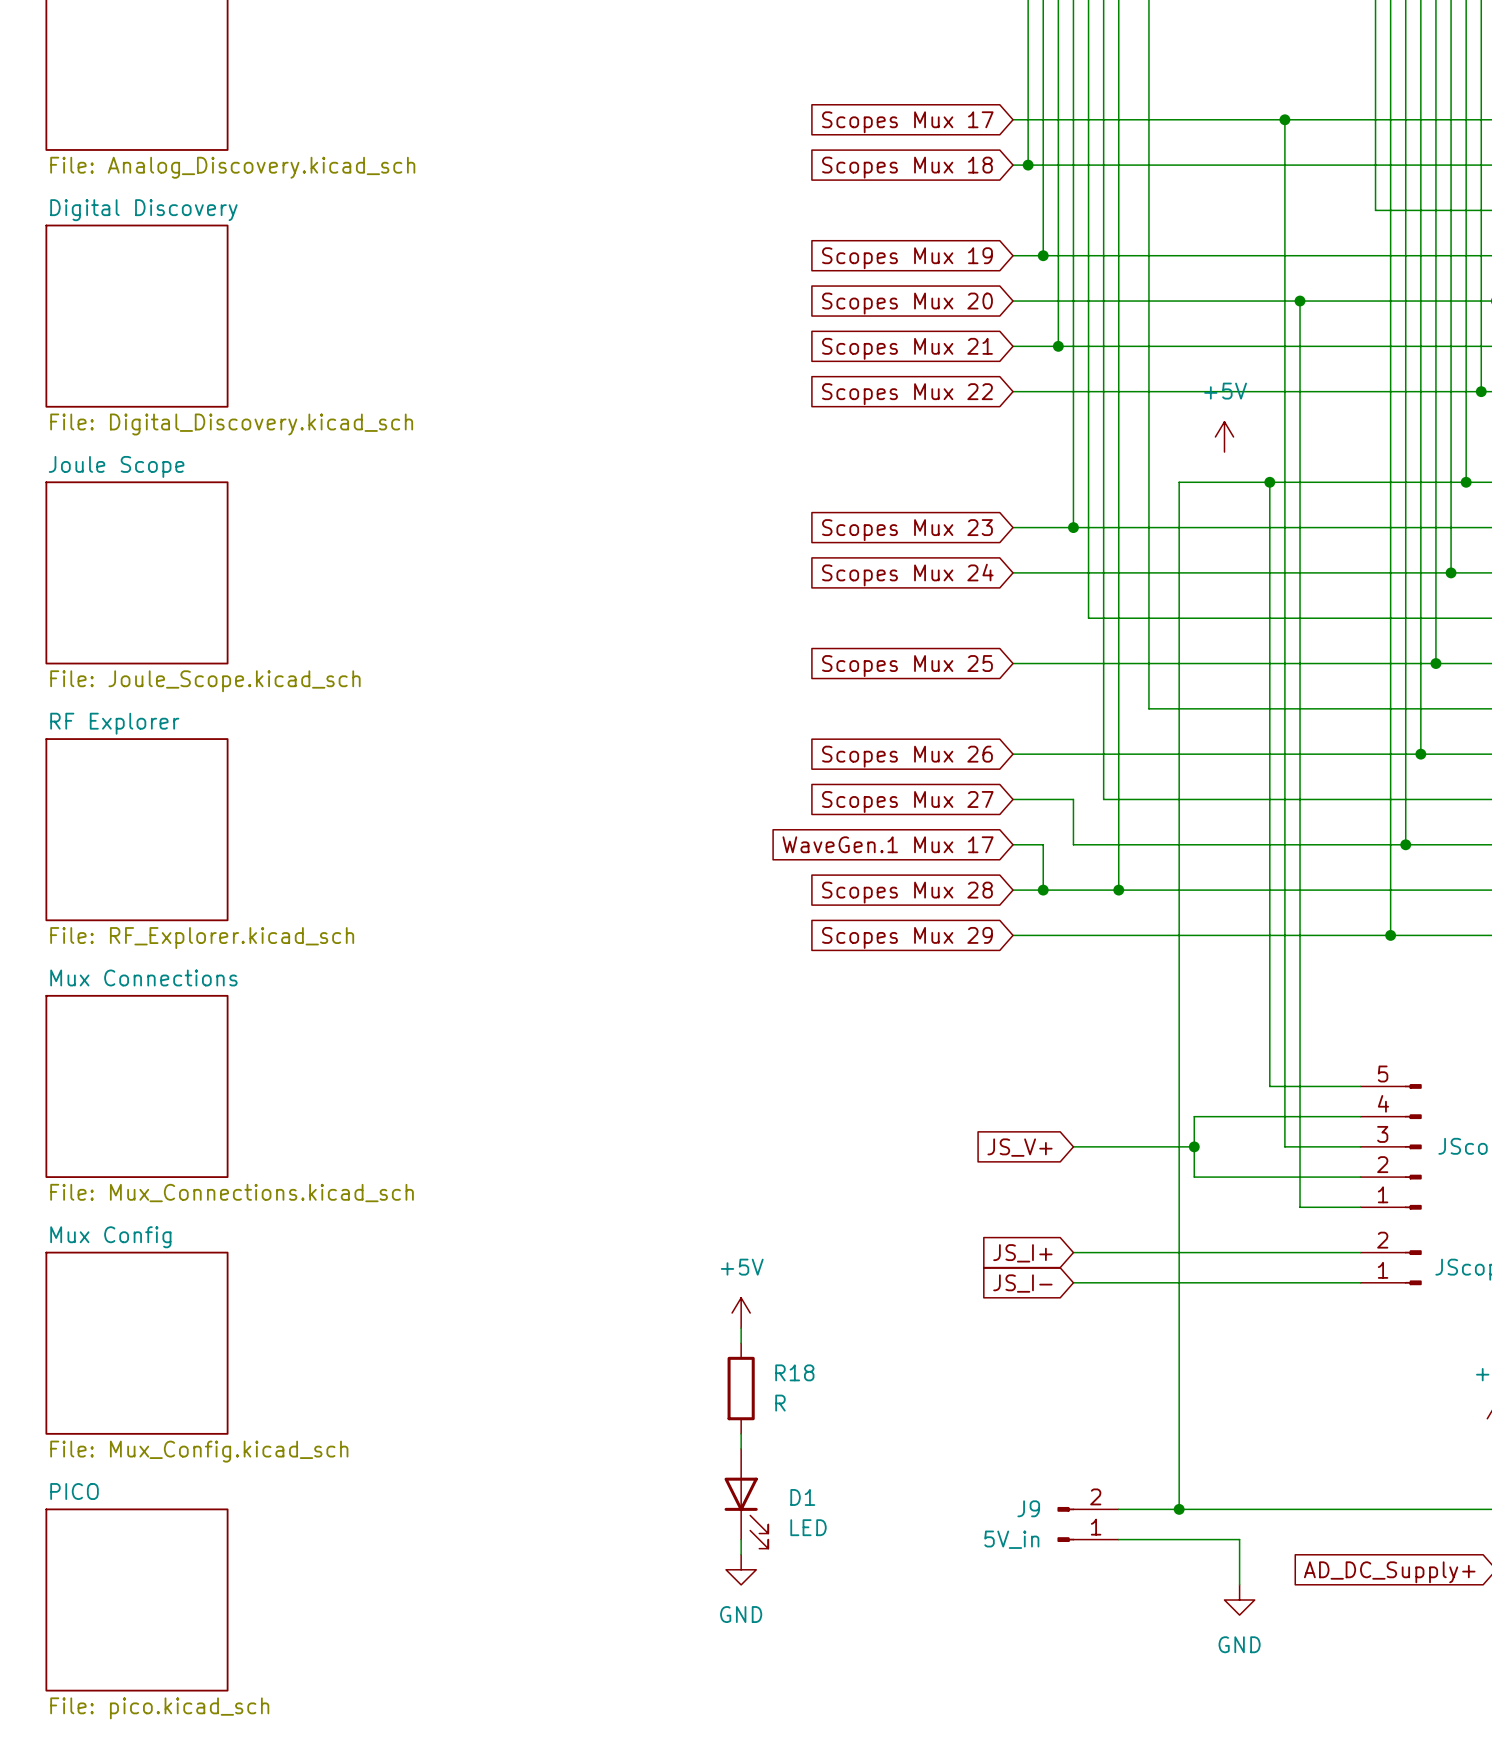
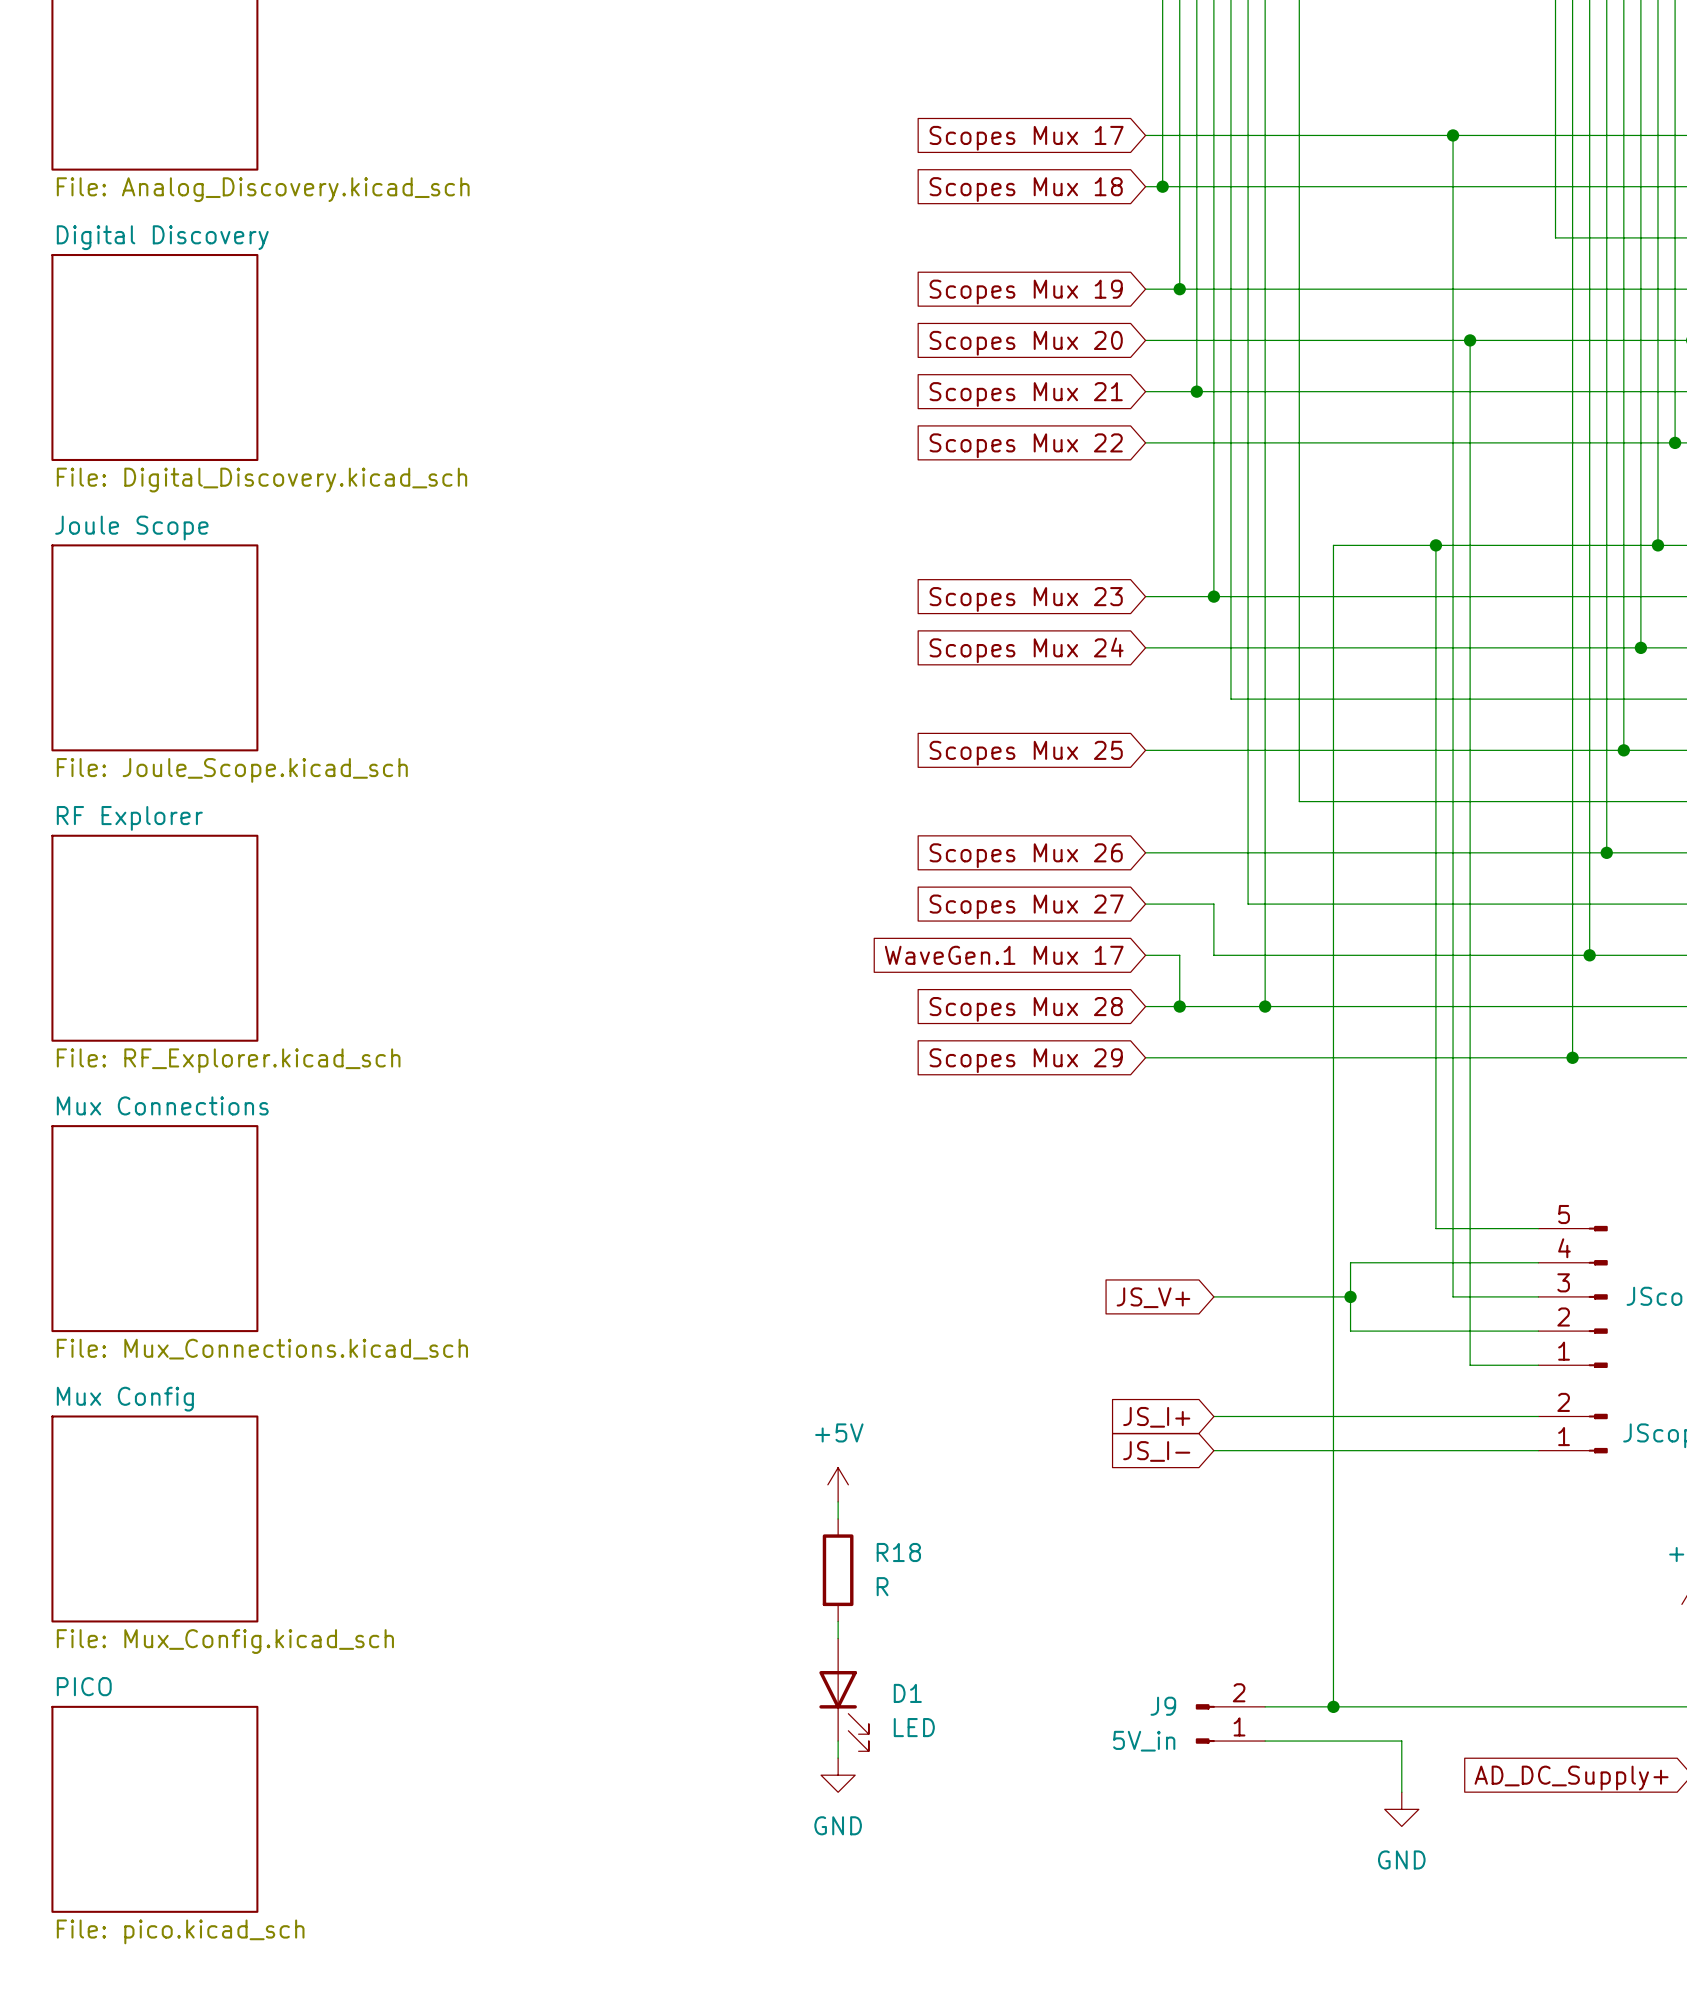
power symbol: +5V (1224, 436) -> none

